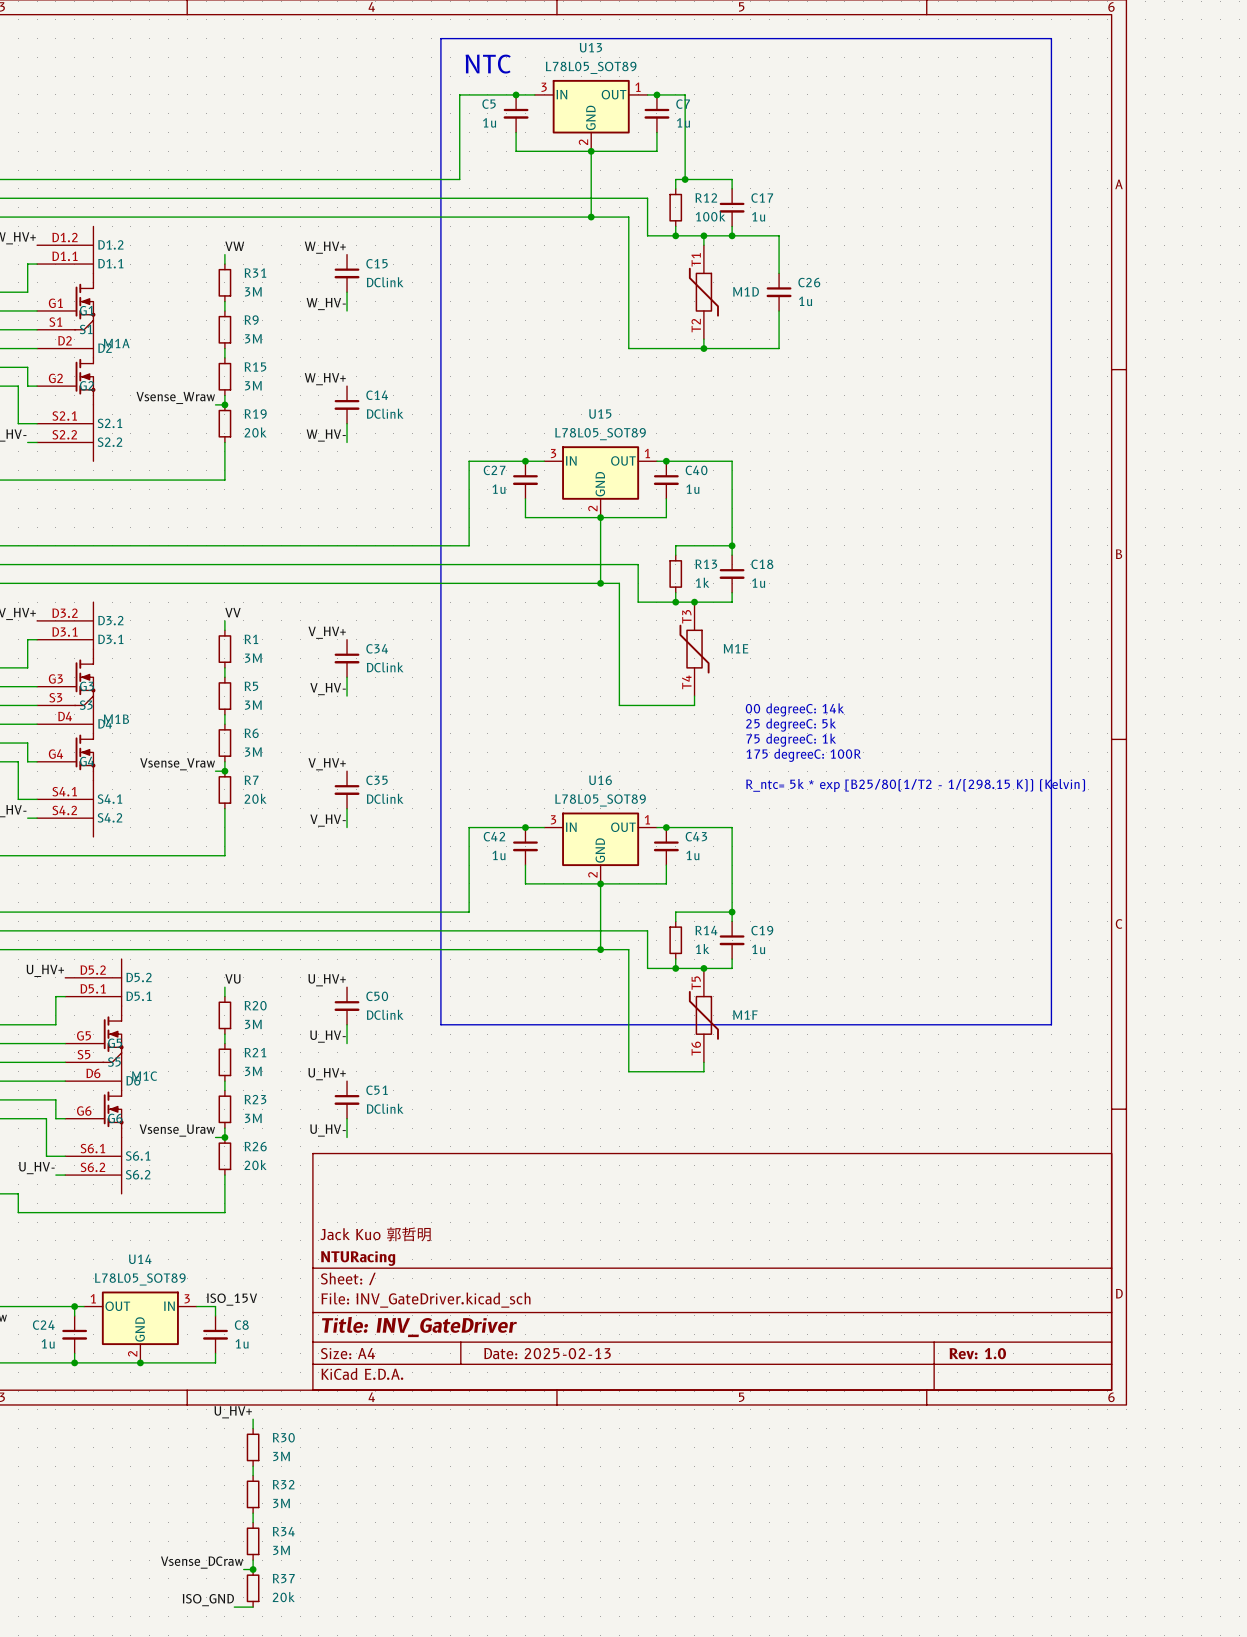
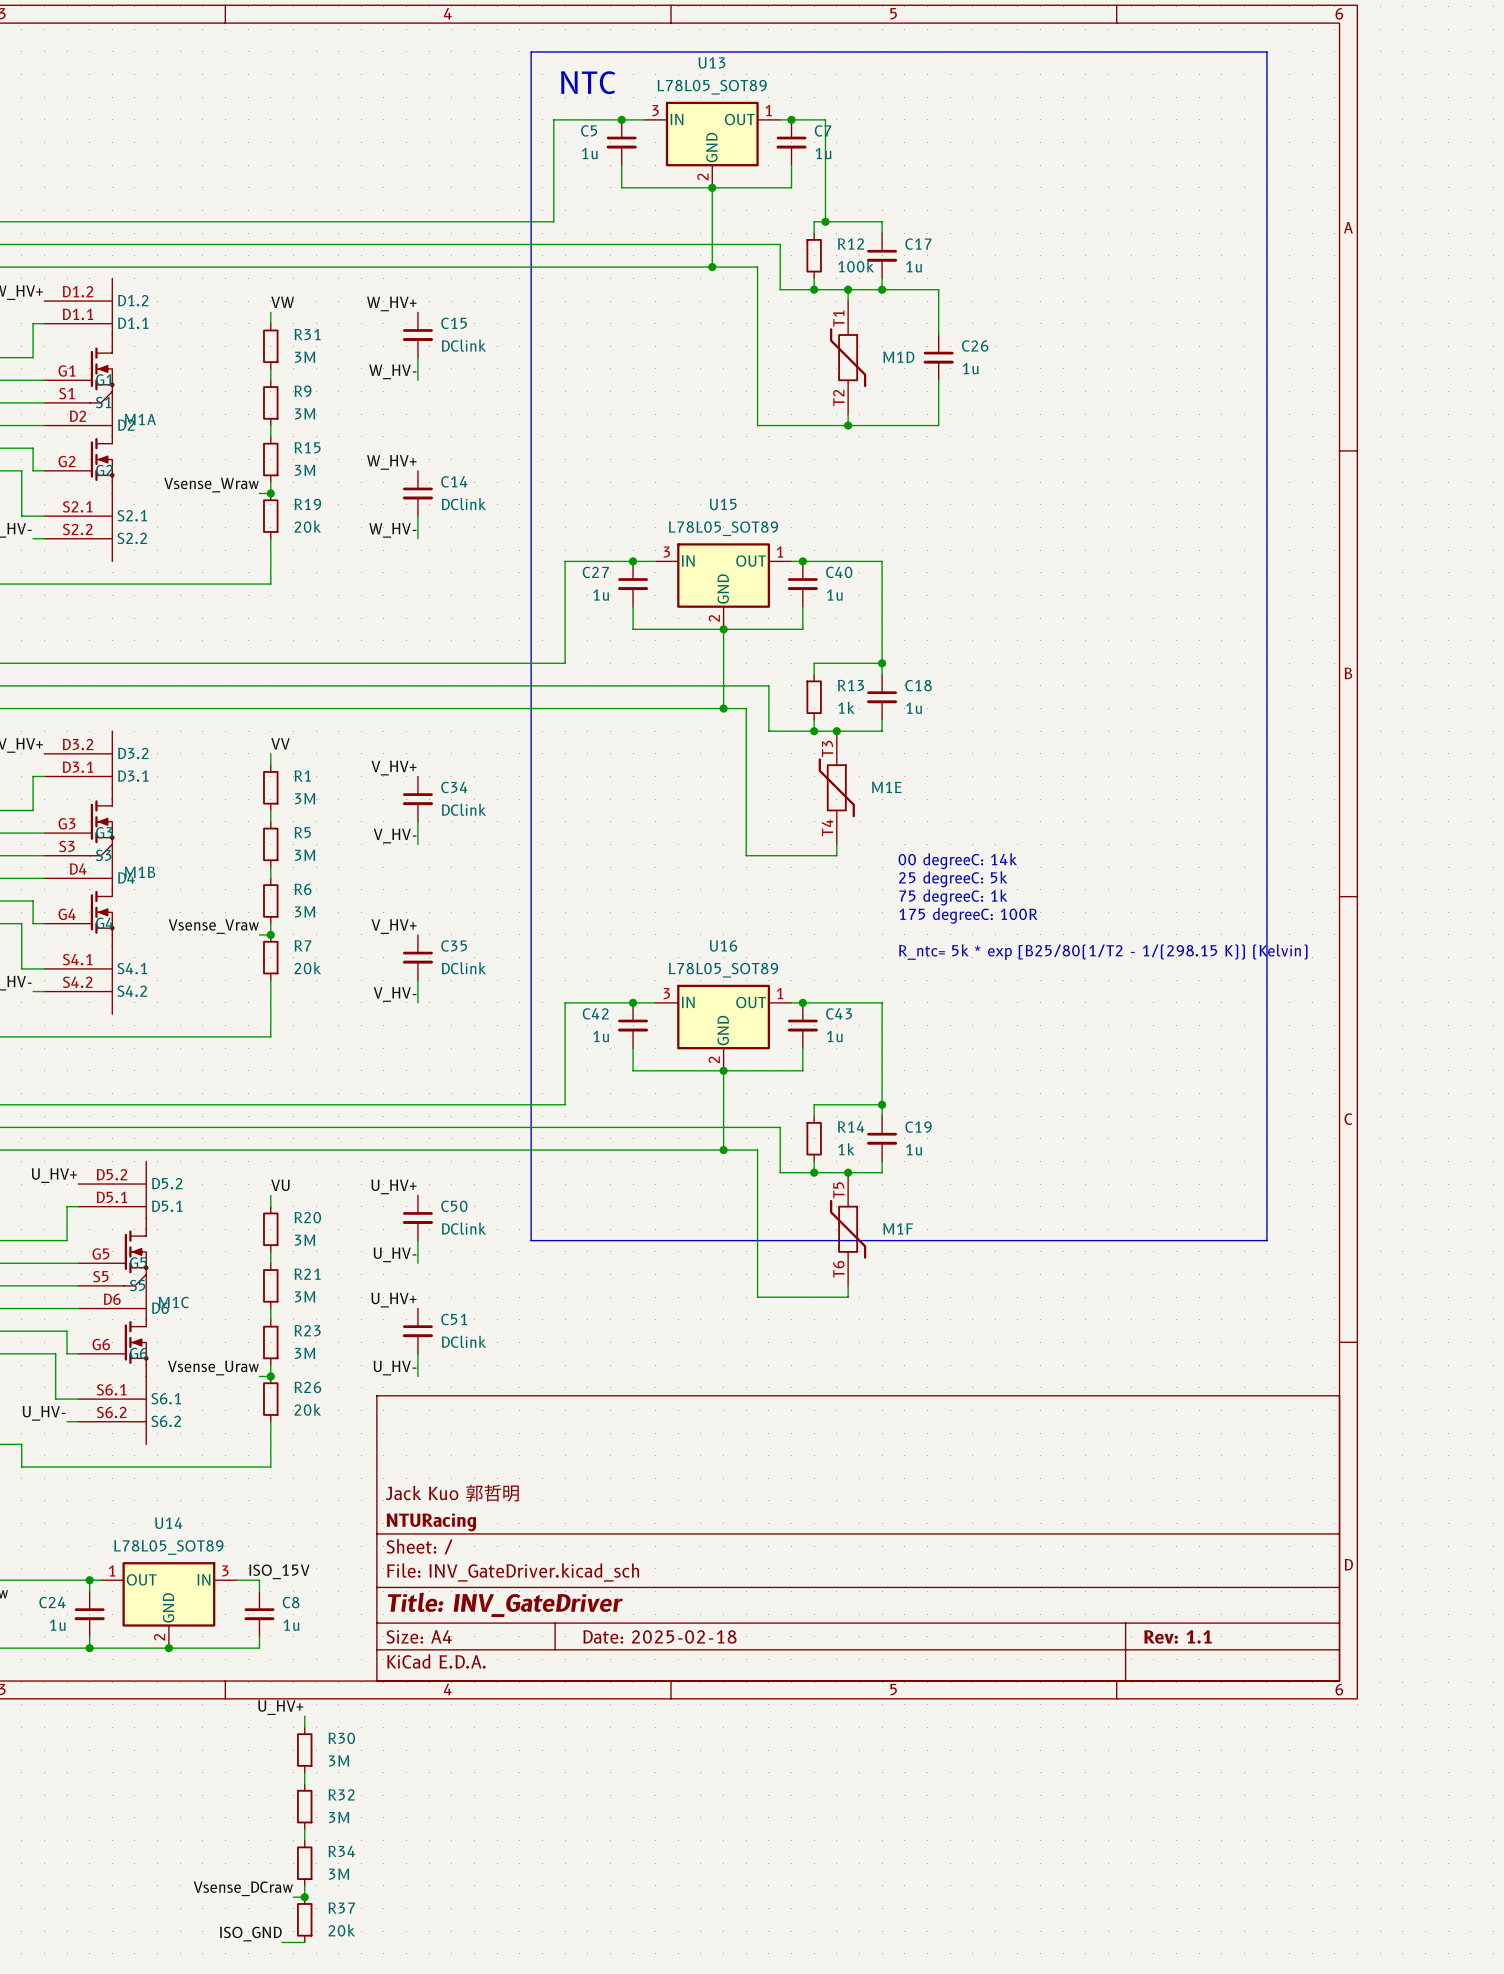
title block: Date: 2025-02-13 (547, 1353) -> Date: 2025-02-18 (659, 1636)
title block: Rev: 1.0 (977, 1353) -> Rev: 1.1 (1177, 1636)

